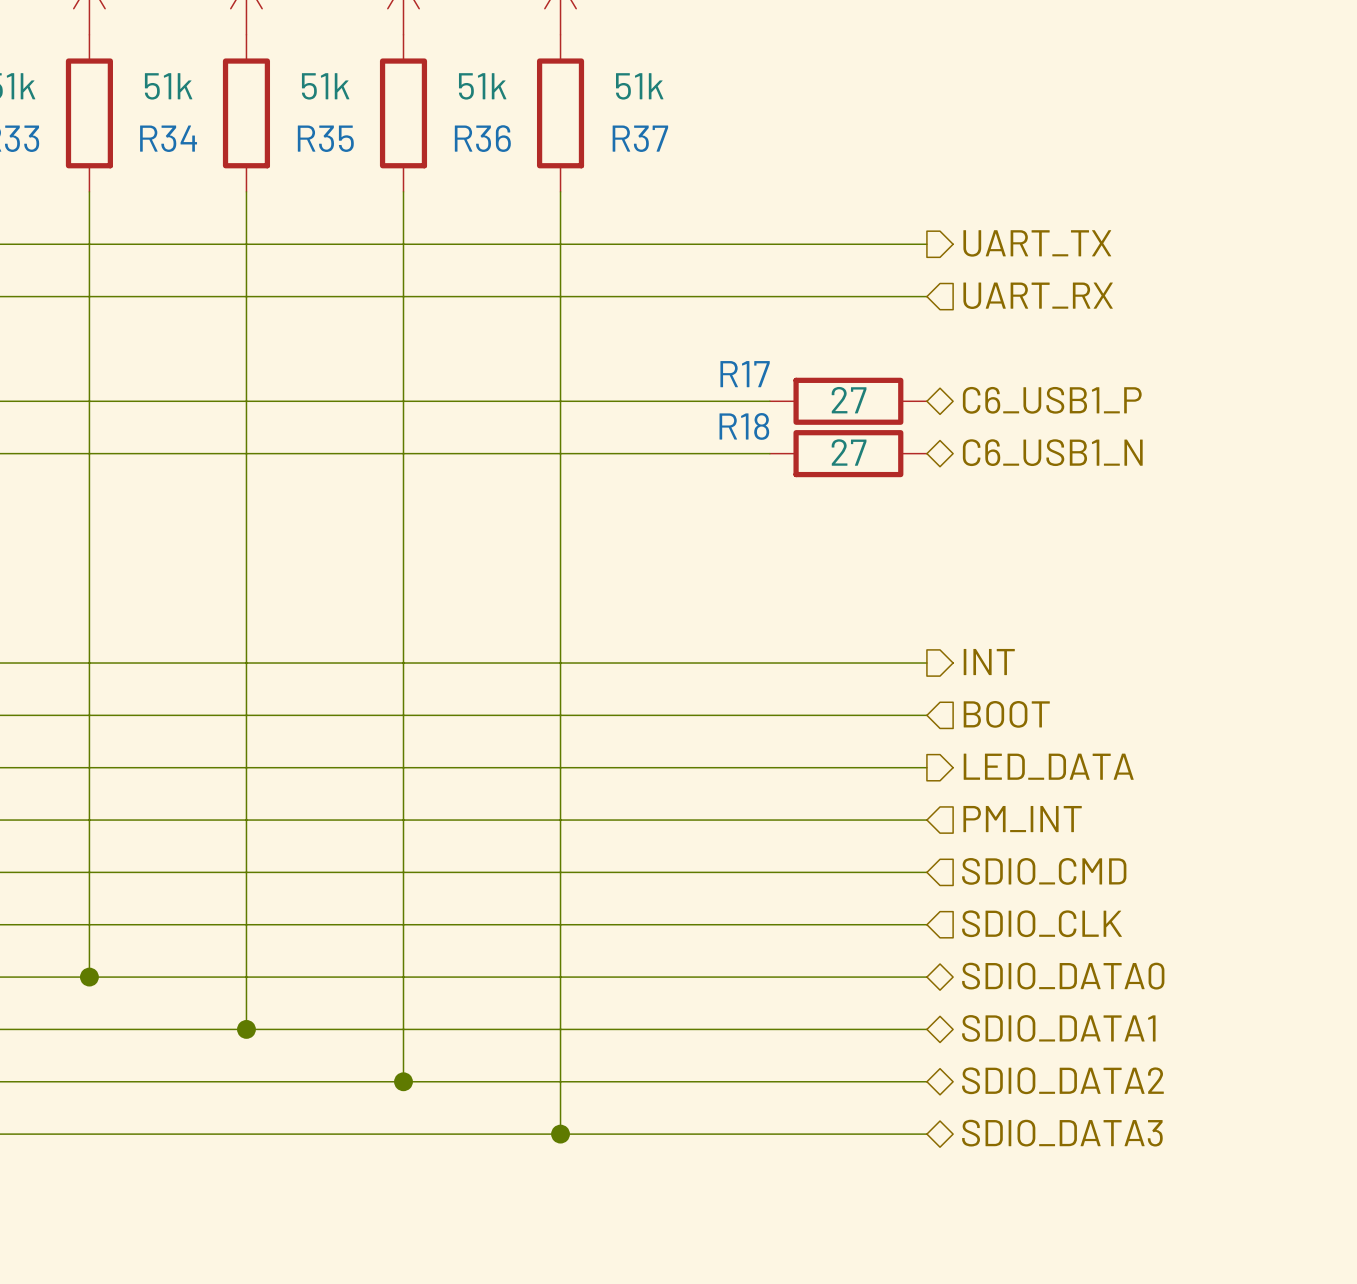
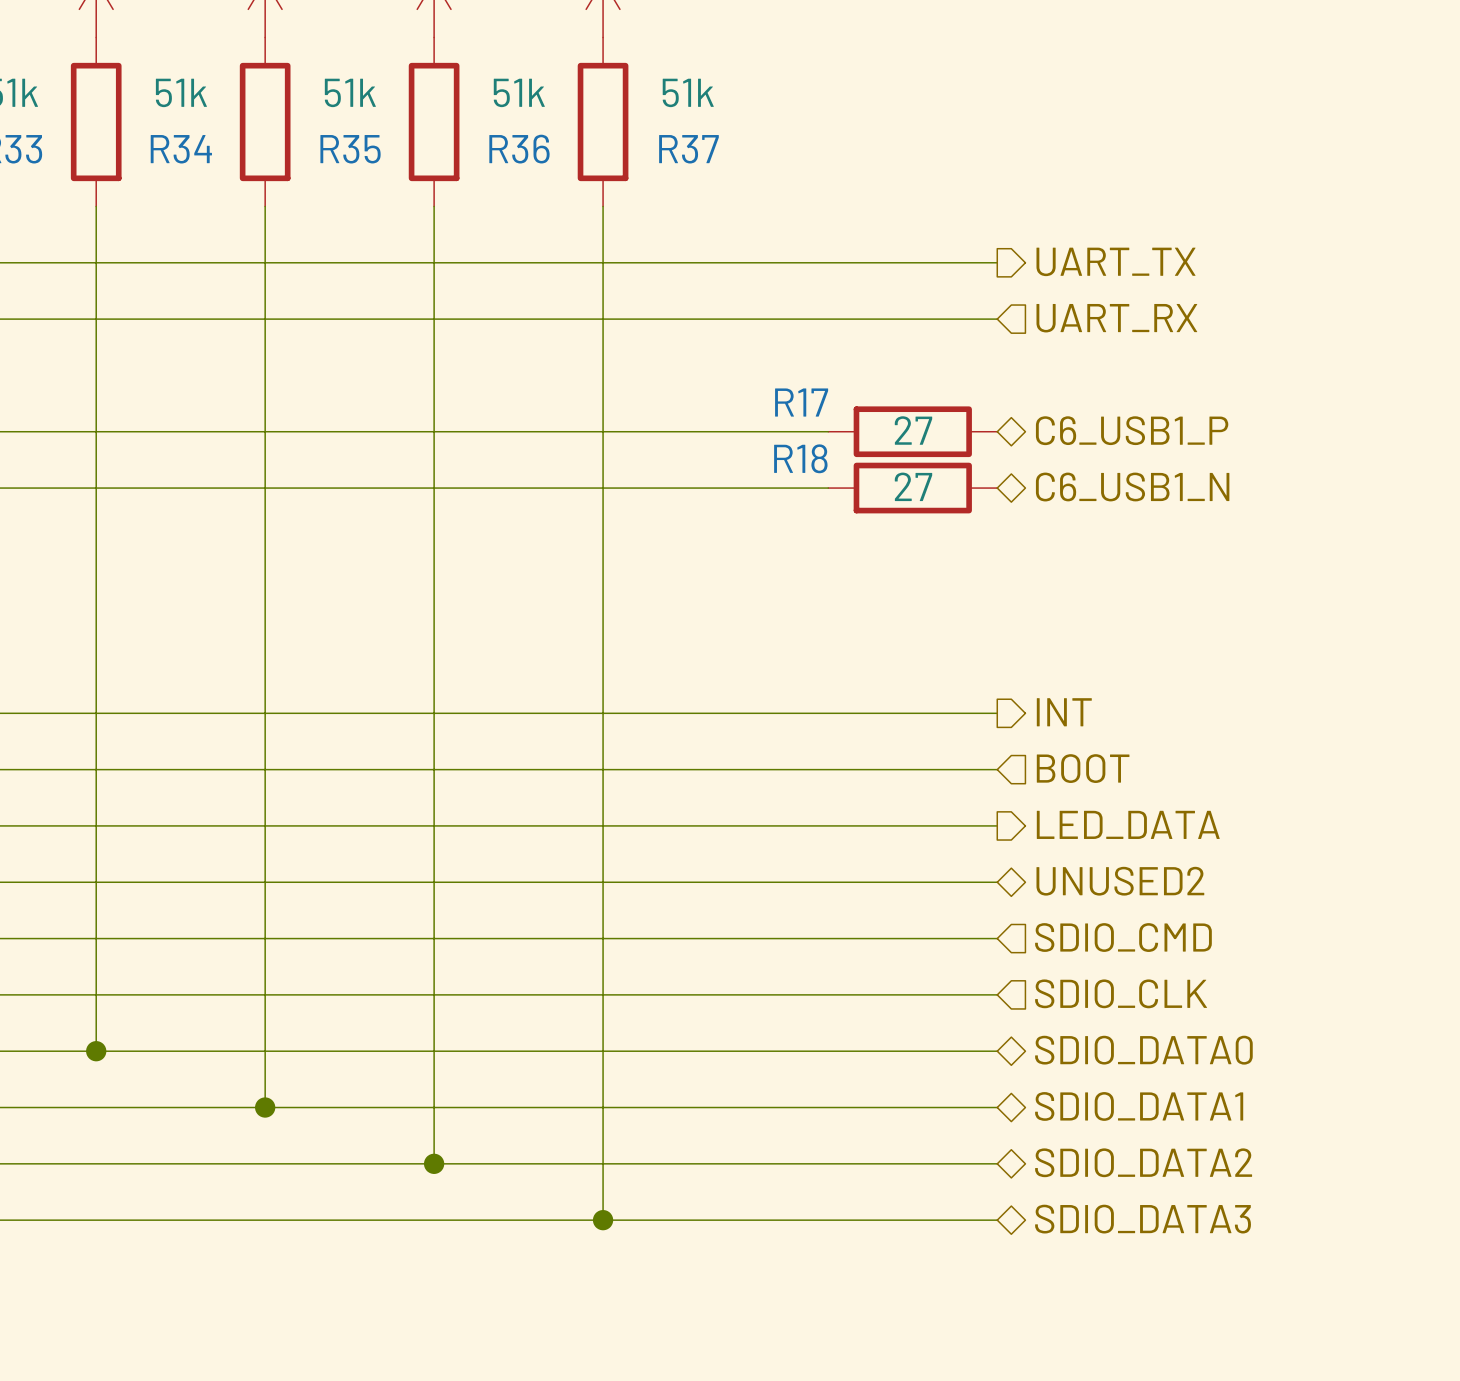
hierarchical label shape: input (1022, 819) -> bidirectional (1120, 881)
hierarchical label: PM_INT (1022, 819) -> UNUSED2 (1120, 881)

